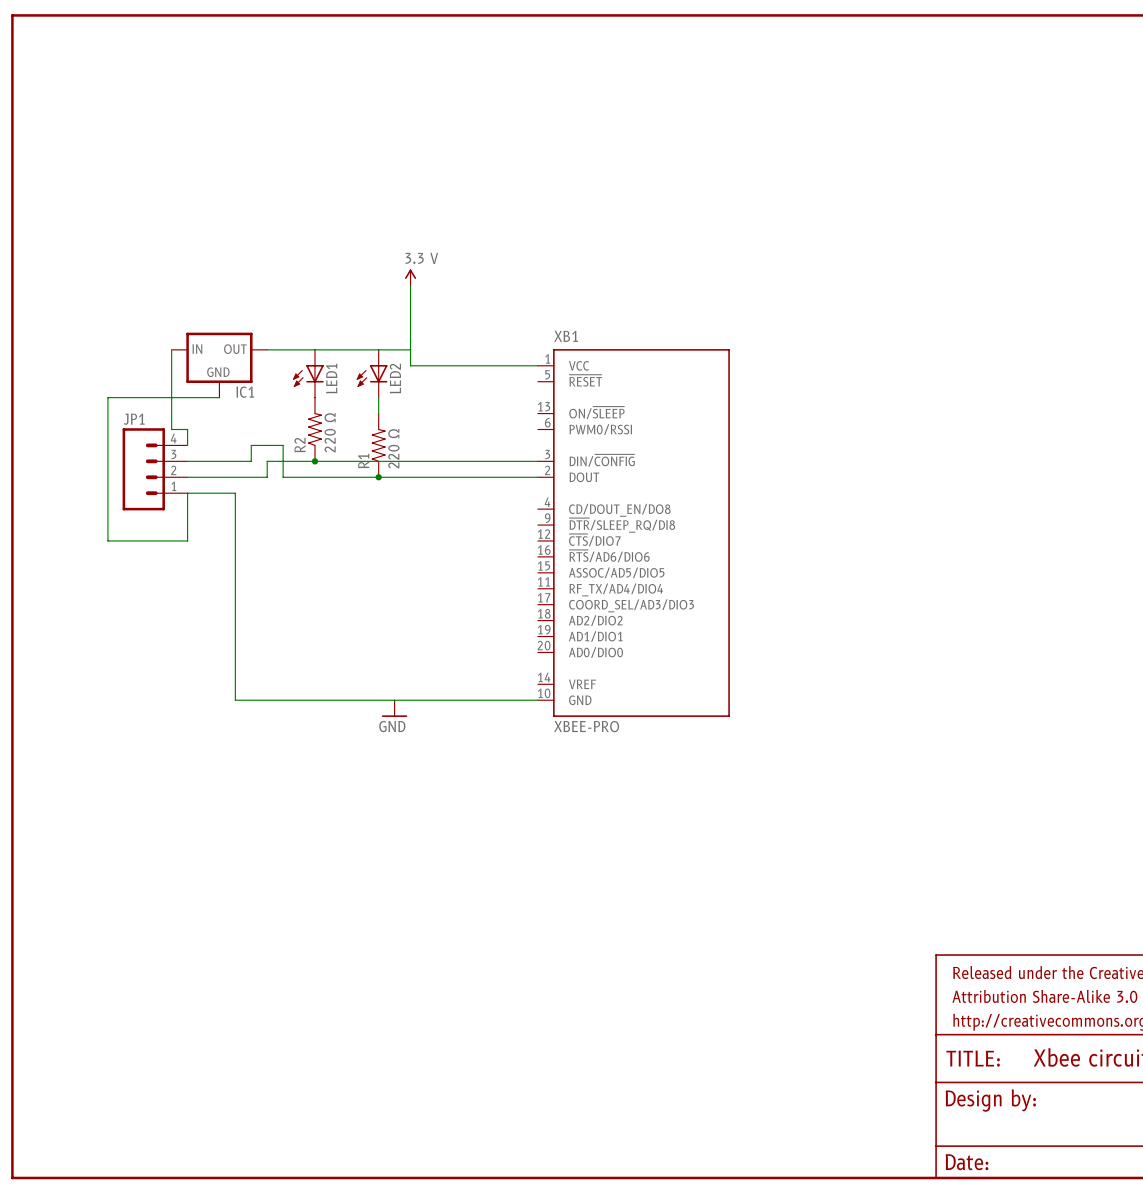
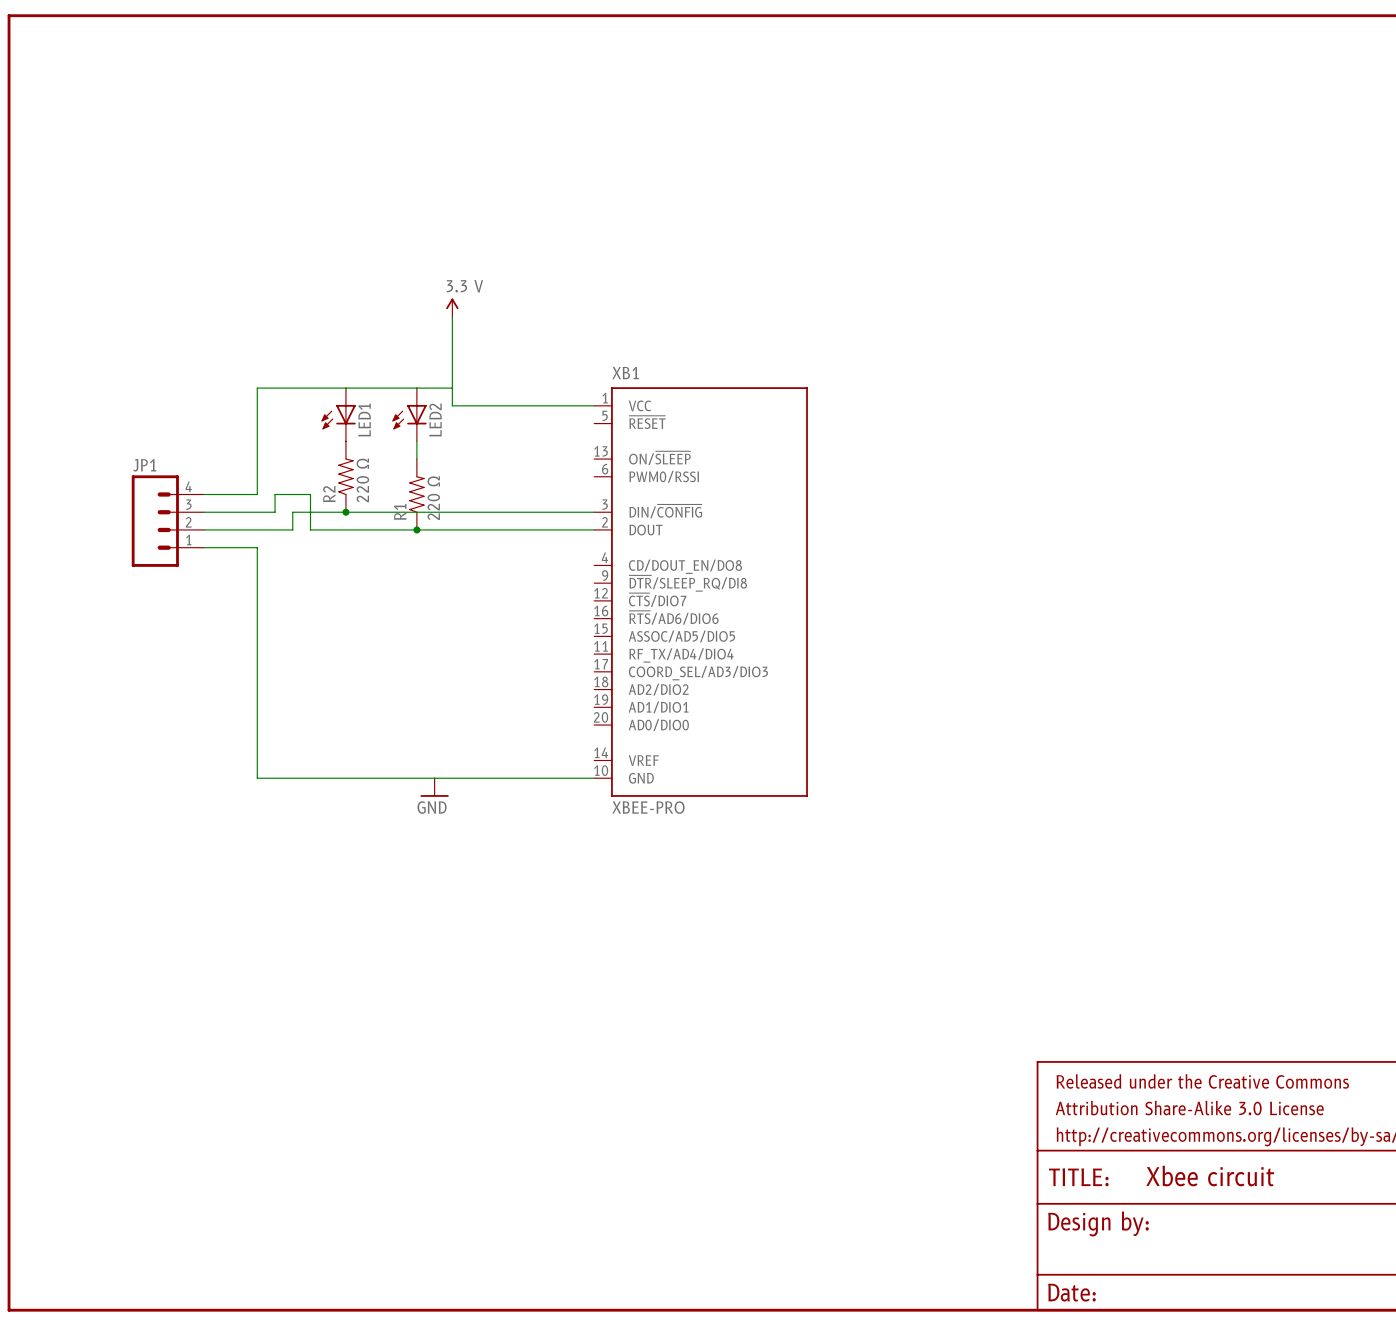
wire: (171, 349) (171, 429) (187, 429) (187, 445) -> (292, 388) (257, 388) (257, 494) (204, 494)
IC1: (219, 365) -> none
wire: (219, 397) (107, 397) (107, 540) (187, 540) (187, 493) -> none

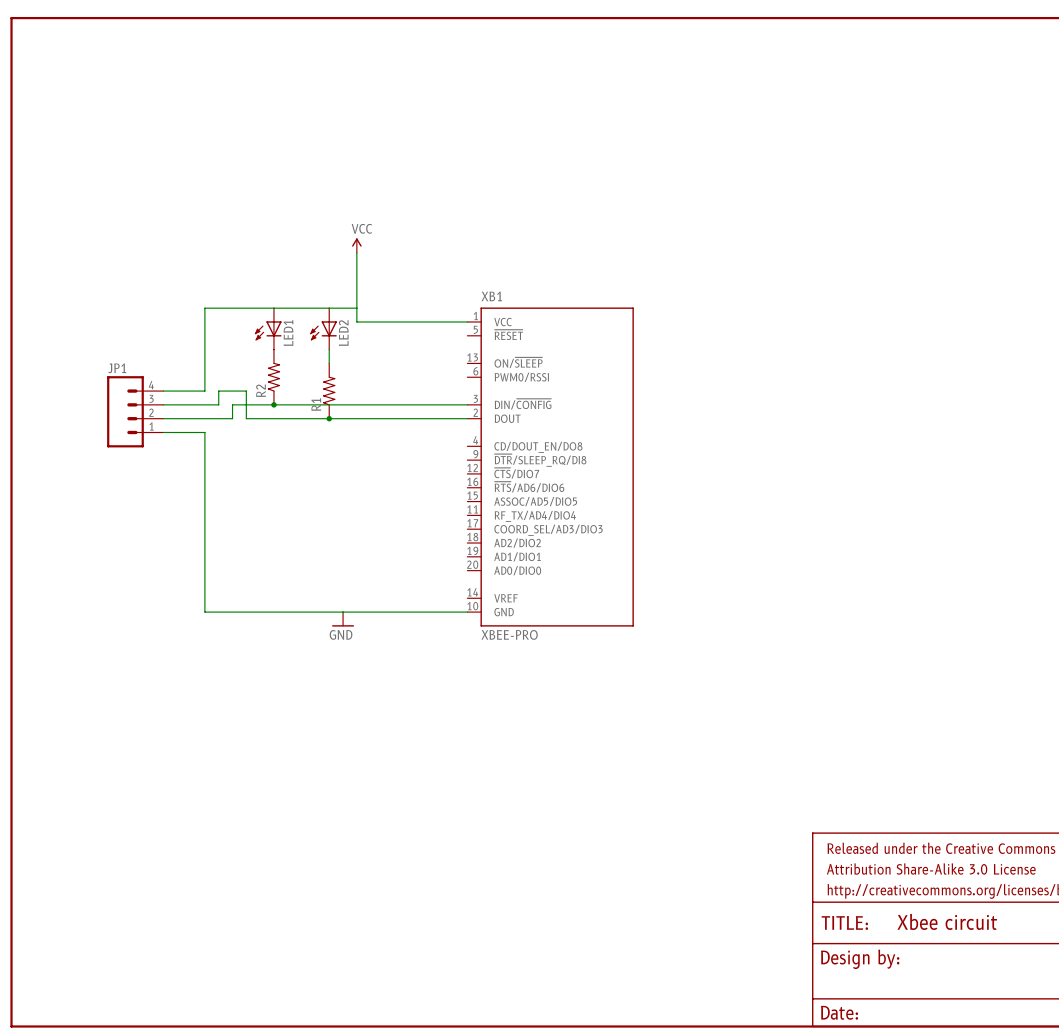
power symbol: 3.3 V (452, 307) -> VCC (356, 245)
R2 value: 220 Ω (362, 480) -> none
R1 value: 220 Ω (433, 498) -> none

